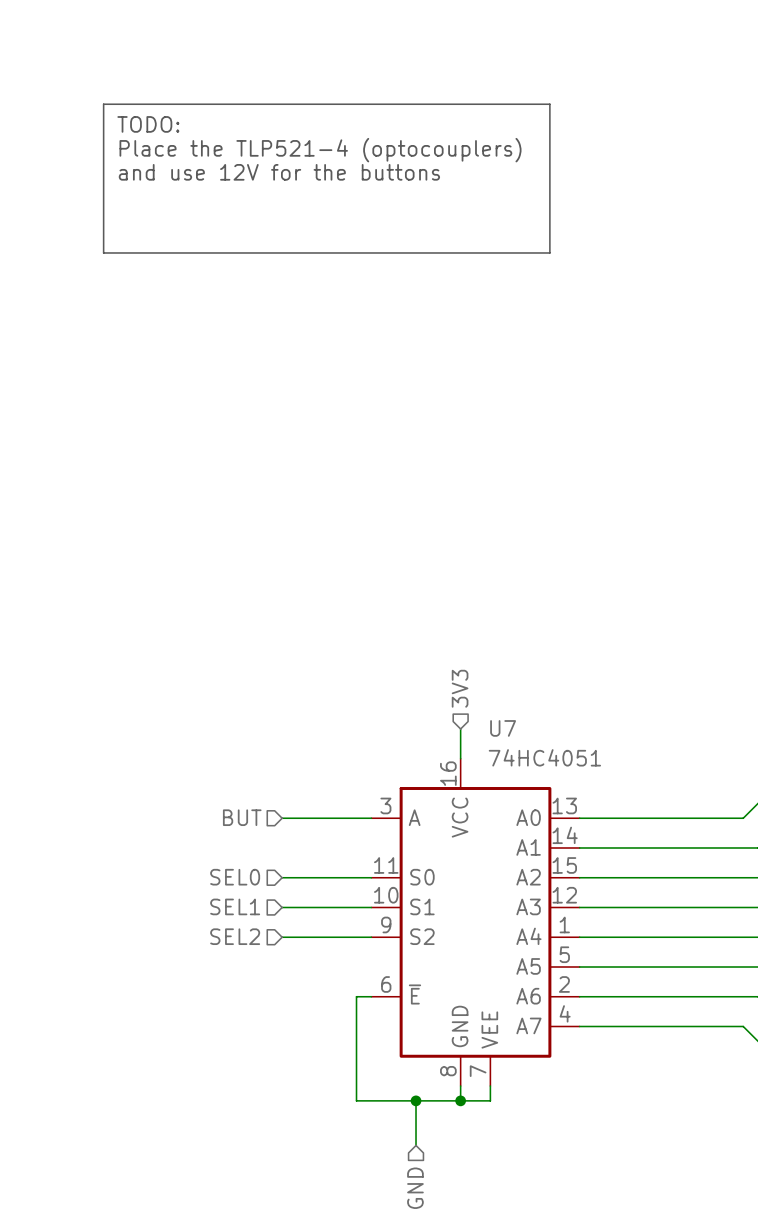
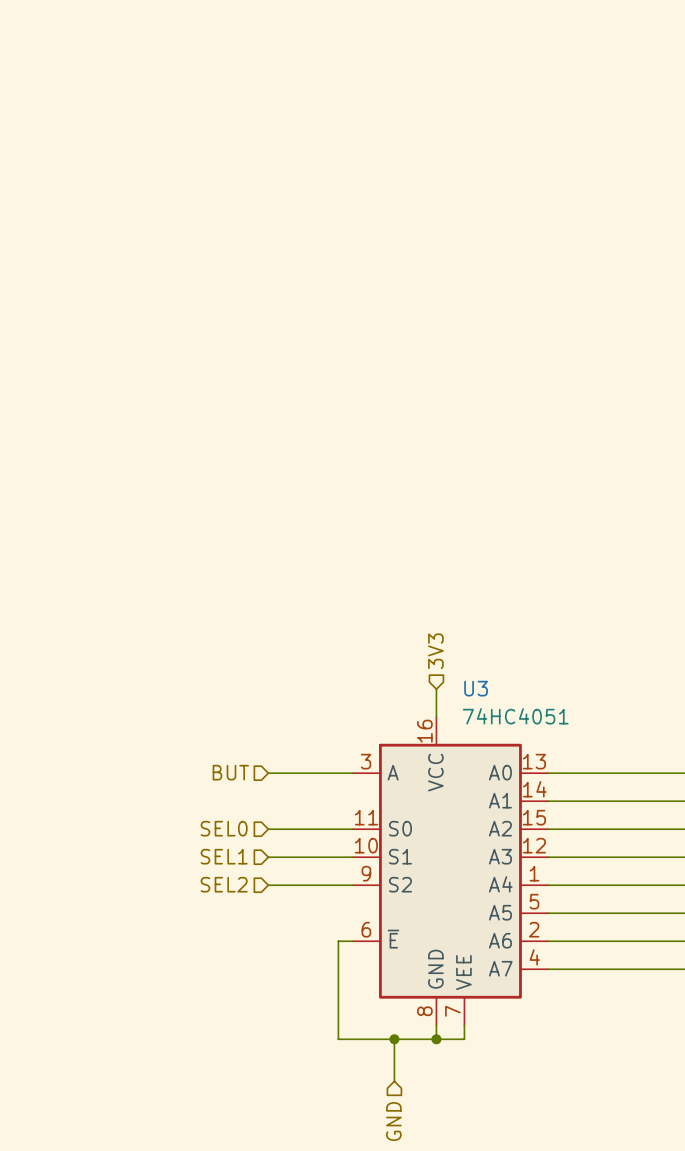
line: (103, 104) (549, 104) (549, 252) (103, 252) (103, 104) -> none
text: TODO: (148, 124) -> none
text: Place the TLP521-4 (optocouplers) (320, 150) -> none
text: and use 12V for the buttons (279, 172) -> none
U7 name: U7 (503, 728) -> U3 (476, 688)

